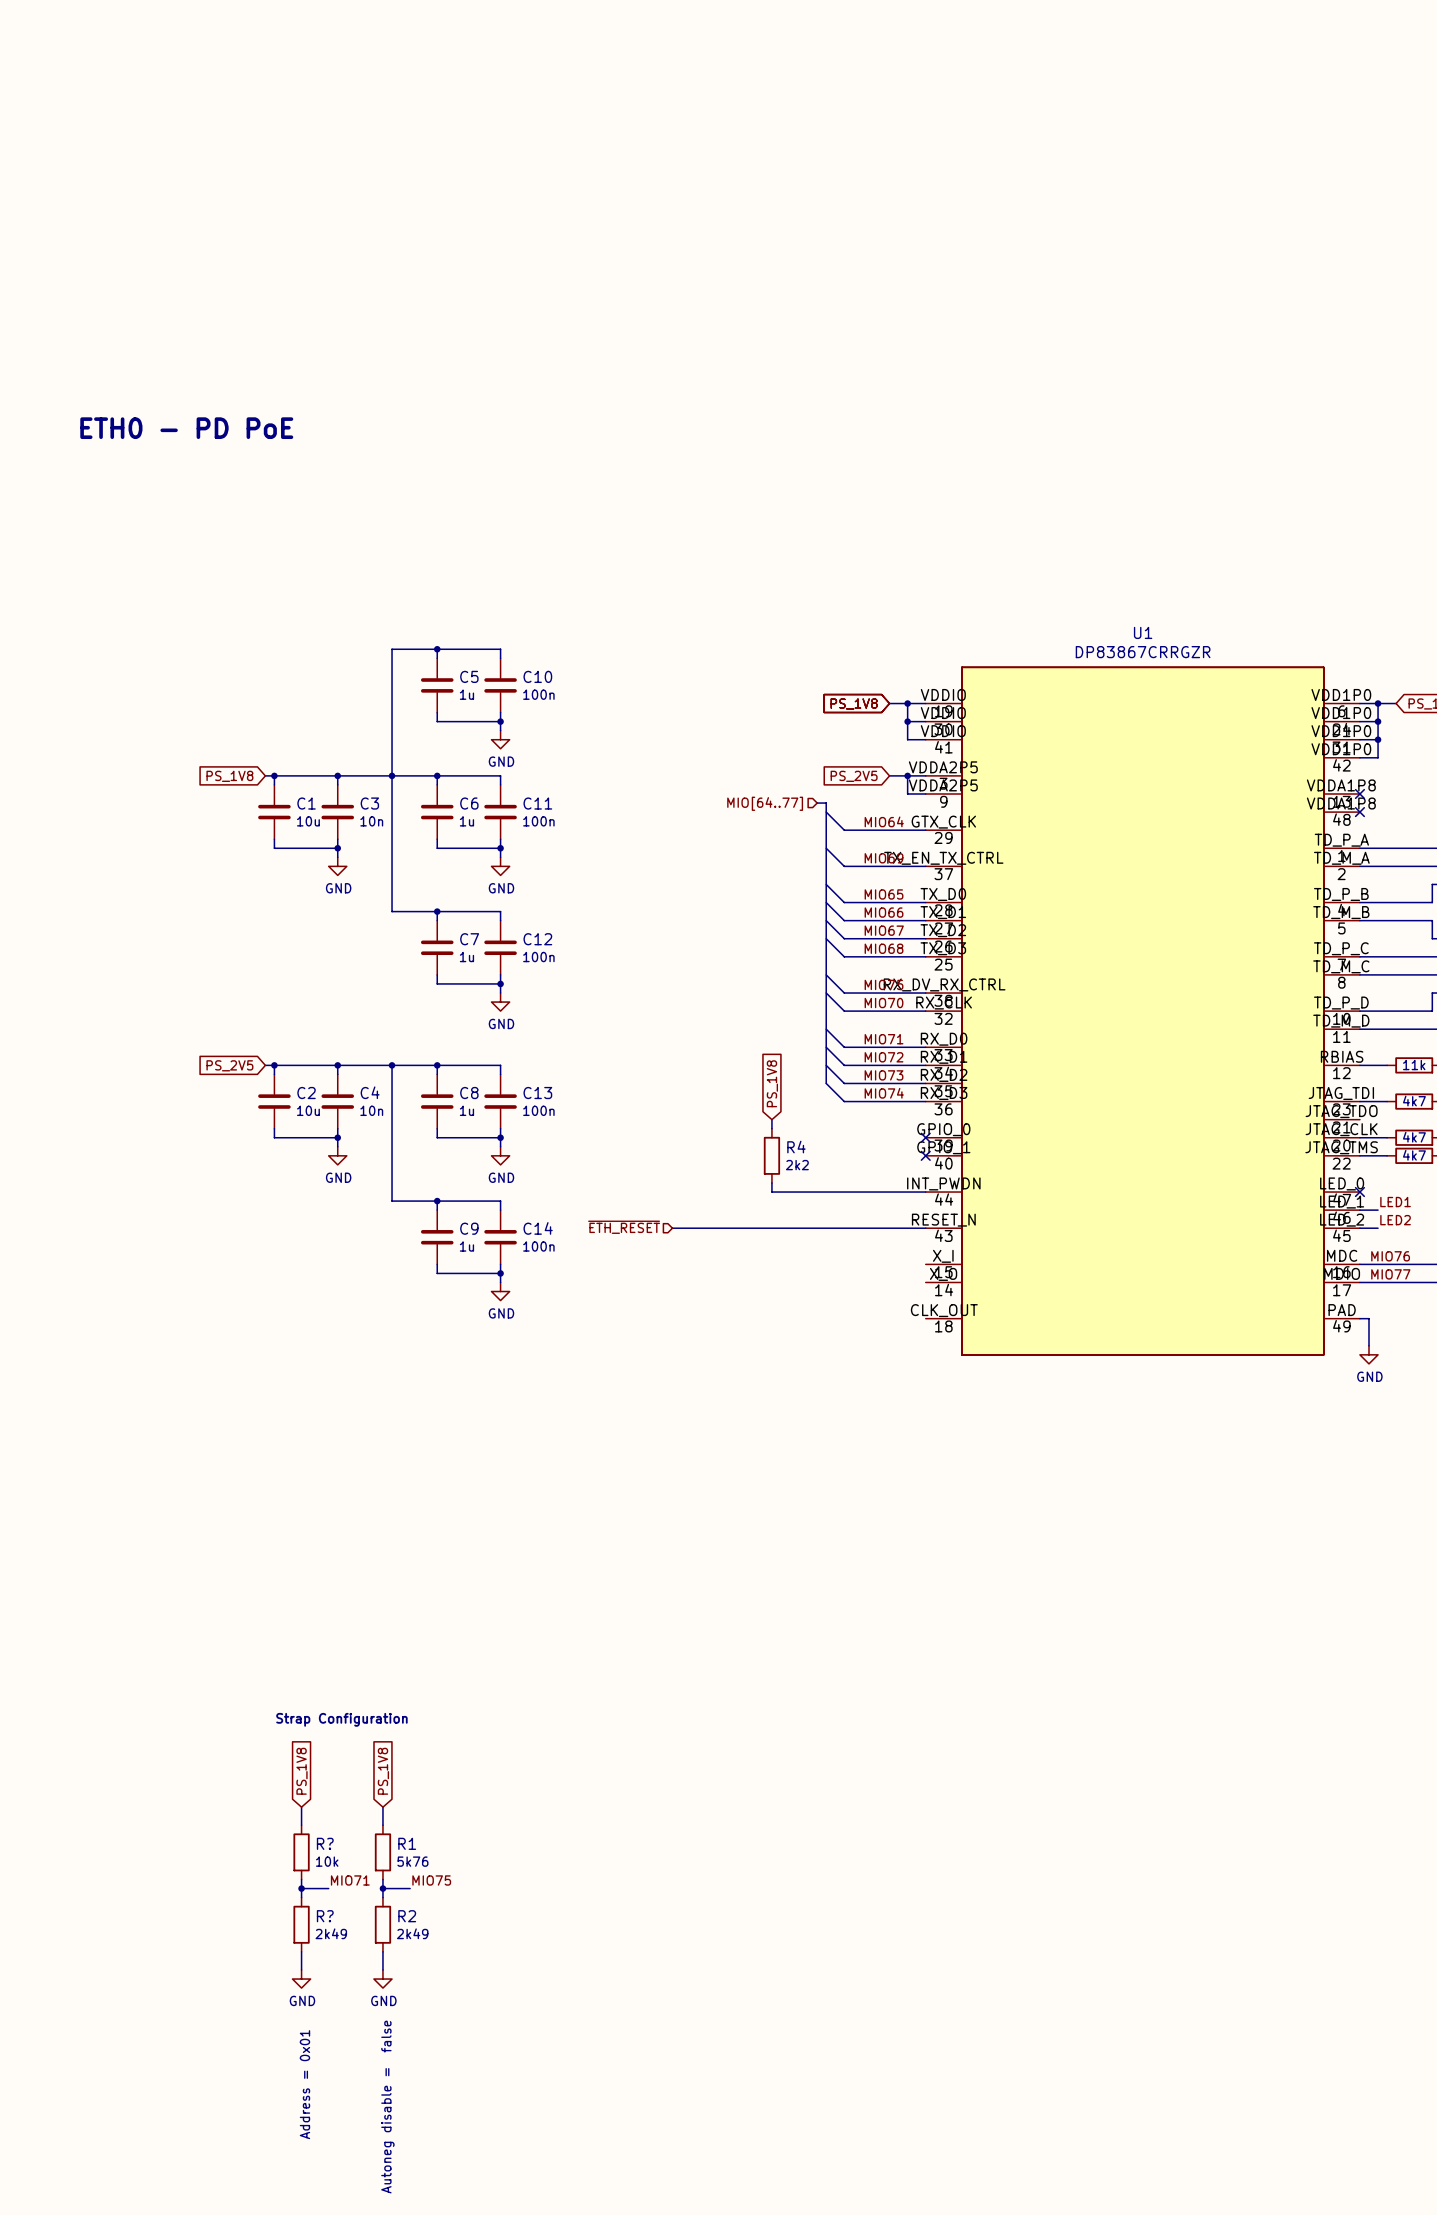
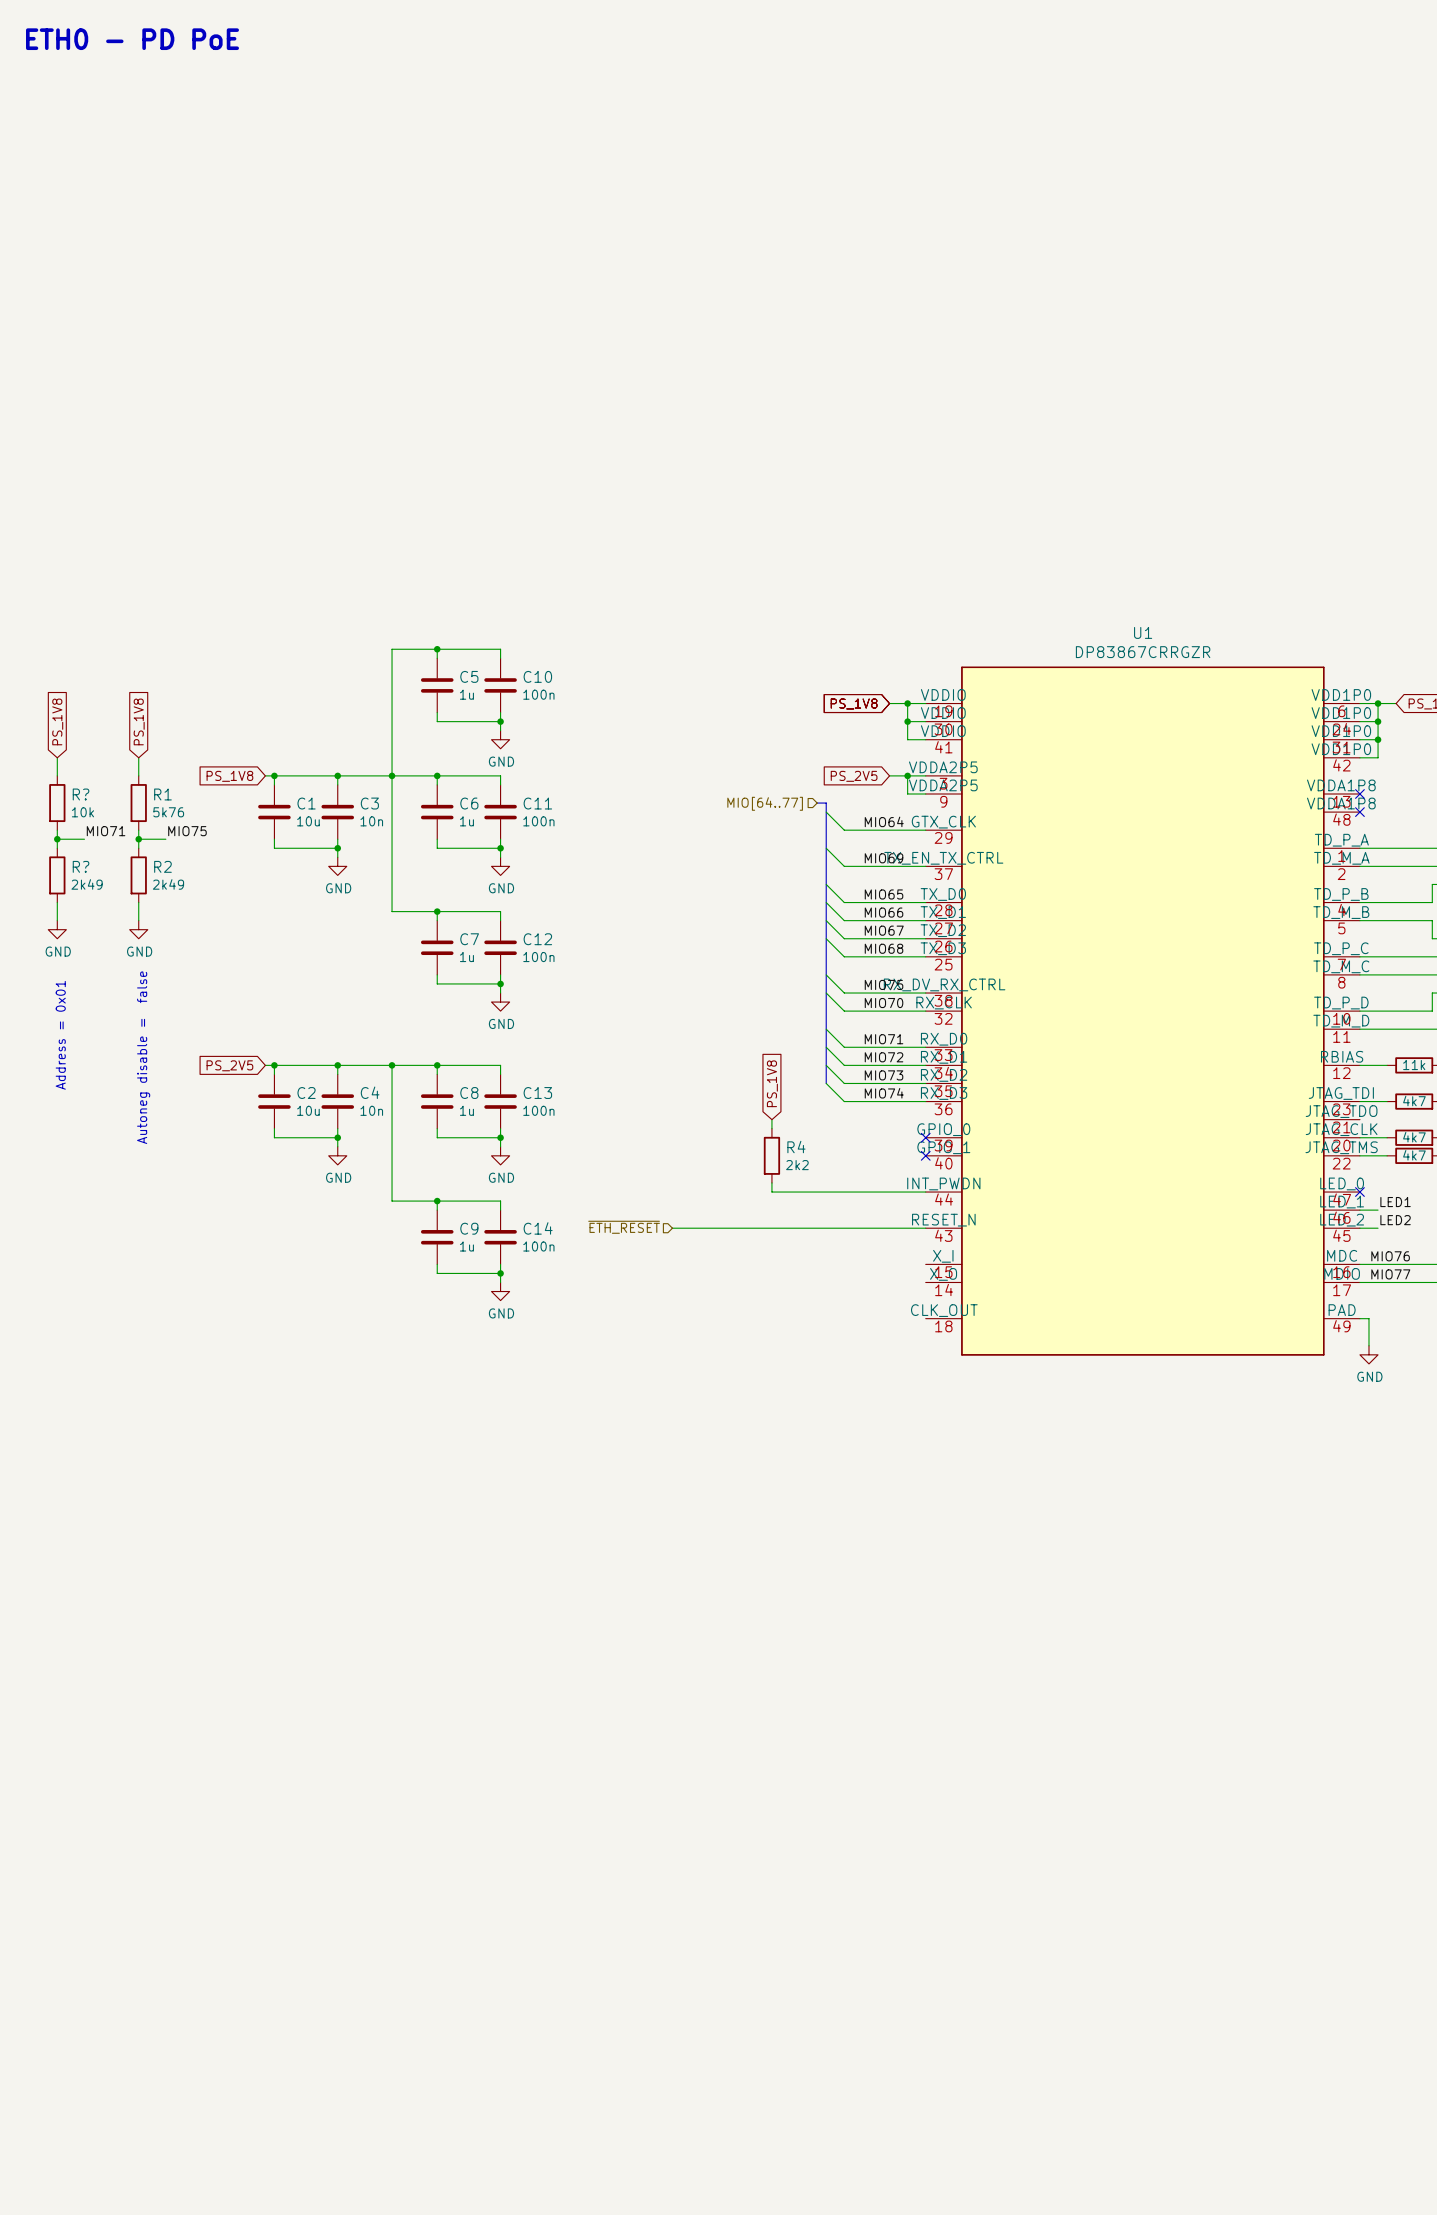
text: none -> ETH0 - PD PoE (132, 39)
text: ETH0 - PD PoE (186, 428) -> none
global label: none -> PS_1V8 (57, 721)
global label: none -> PS_1V8 (139, 721)
wire: none -> (57, 757) (57, 775)
wire: none -> (138, 757) (138, 775)
R?: none -> (57, 803)
wire: none -> (57, 830) (57, 848)
wire: none -> (138, 830) (138, 848)
label: none -> MIO71 (106, 831)
label: none -> MIO75 (187, 831)
wire: none -> (57, 839) (84, 839)
junction: none -> (57, 839)
wire: none -> (138, 839) (165, 839)
junction: none -> (138, 839)
R?: none -> (57, 875)
wire: none -> (57, 902) (57, 920)
wire: none -> (138, 902) (138, 920)
power symbol: none -> GND (57, 929)
power symbol: none -> GND (138, 929)
text: none -> Address = 0x01 (60, 1035)
text: none -> Autoneg disable = false (143, 1057)
text: Strap Configuration (341, 1719) -> none
global label: PS_1V8 (301, 1771) -> none
global label: PS_1V8 (383, 1771) -> none
wire: (301, 1807) (301, 1825) -> none
wire: (382, 1807) (382, 1825) -> none
R?: (301, 1852) -> none
R1 position: (382, 1852) -> (138, 803)
wire: (301, 1879) (301, 1897) -> none
wire: (382, 1879) (382, 1897) -> none
label: MIO71 (350, 1880) -> none
label: MIO75 (431, 1880) -> none
wire: (301, 1888) (328, 1888) -> none
junction: (301, 1888) -> none
wire: (382, 1888) (410, 1888) -> none
junction: (382, 1888) -> none
R?: (301, 1924) -> none
R2 position: (382, 1924) -> (138, 875)
wire: (301, 1951) (301, 1969) -> none
wire: (382, 1951) (382, 1969) -> none
power symbol: GND (301, 1979) -> none
power symbol: GND (382, 1979) -> none
text: Address = 0x01 (304, 2084) -> none
text: Autoneg disable = false (387, 2107) -> none

